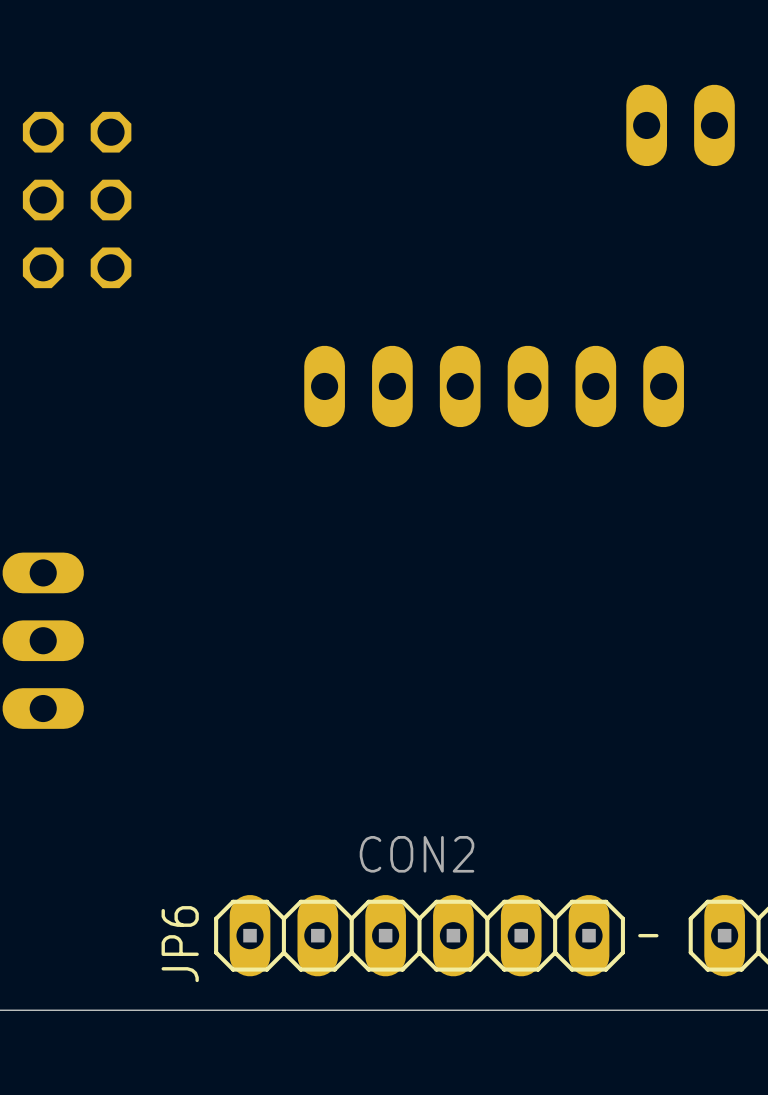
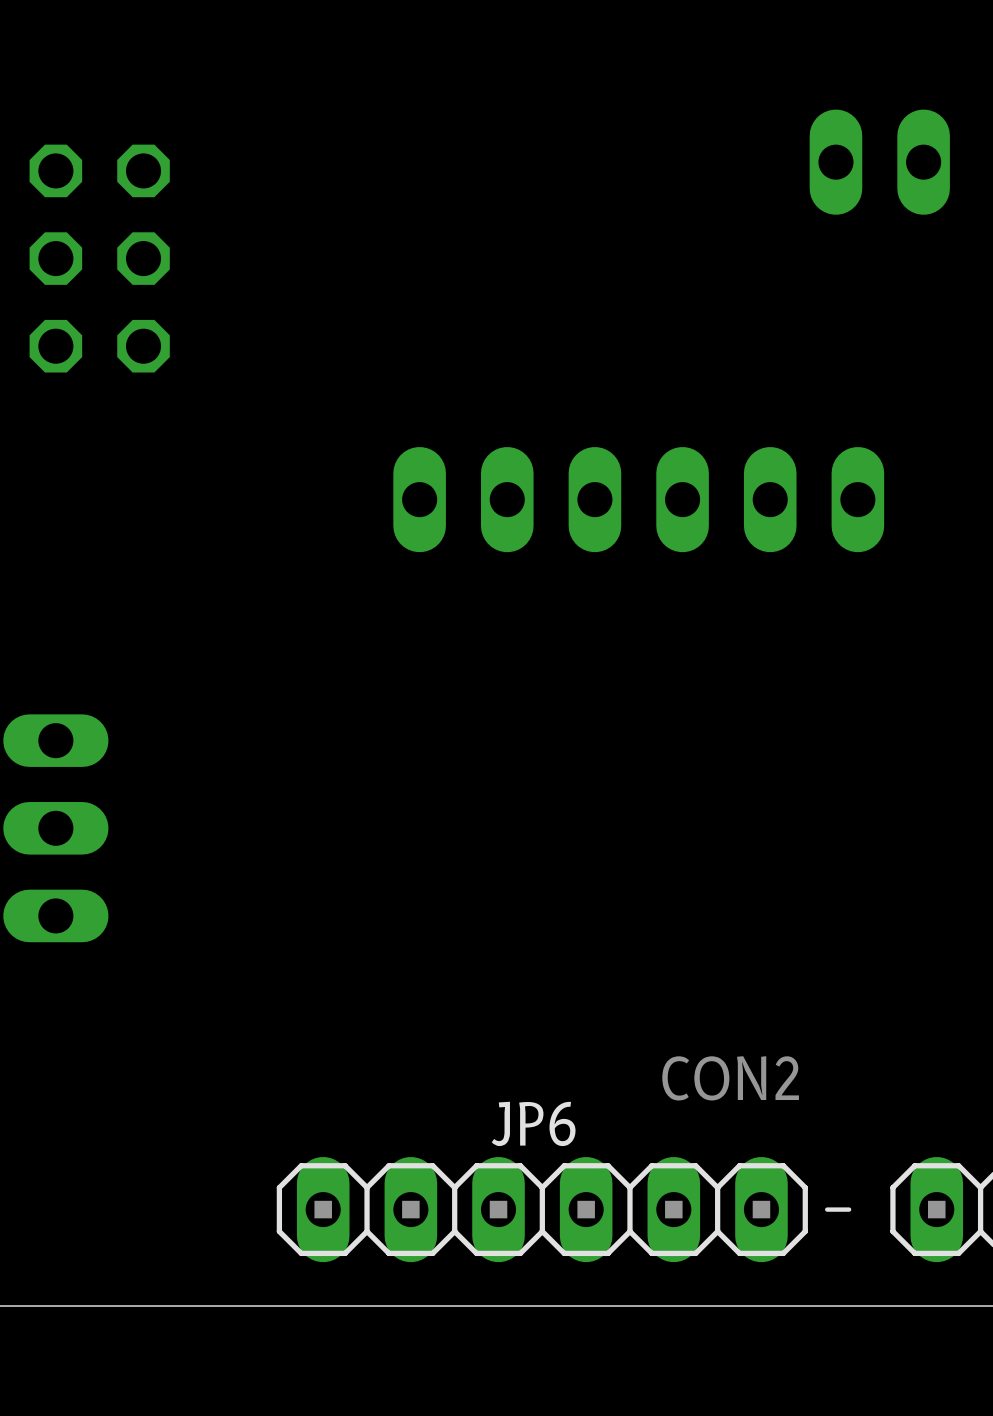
JP6 value position: CON2 (417, 854) -> CON2 (730, 1078)
JP6 name rotation: 0° (180, 944) -> 90° clockwise (533, 1123)
JP6 name position: JP6 (180, 944) -> JP6 (533, 1123)

